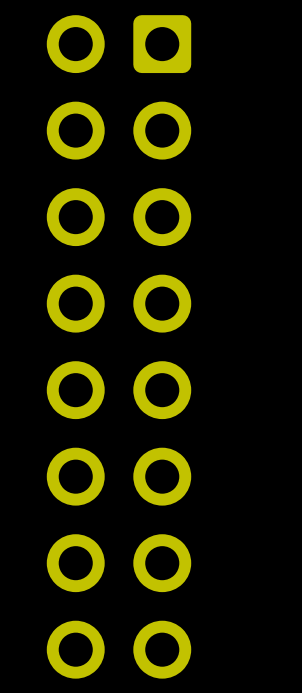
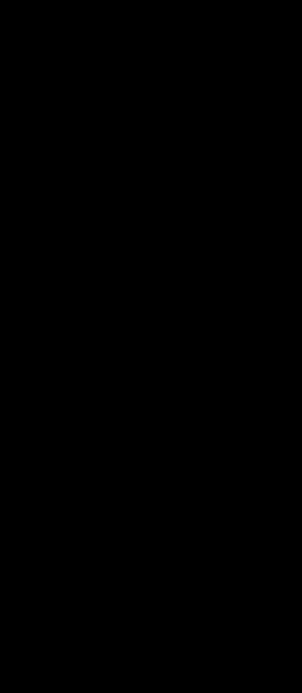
part: (119, 346) -> none

